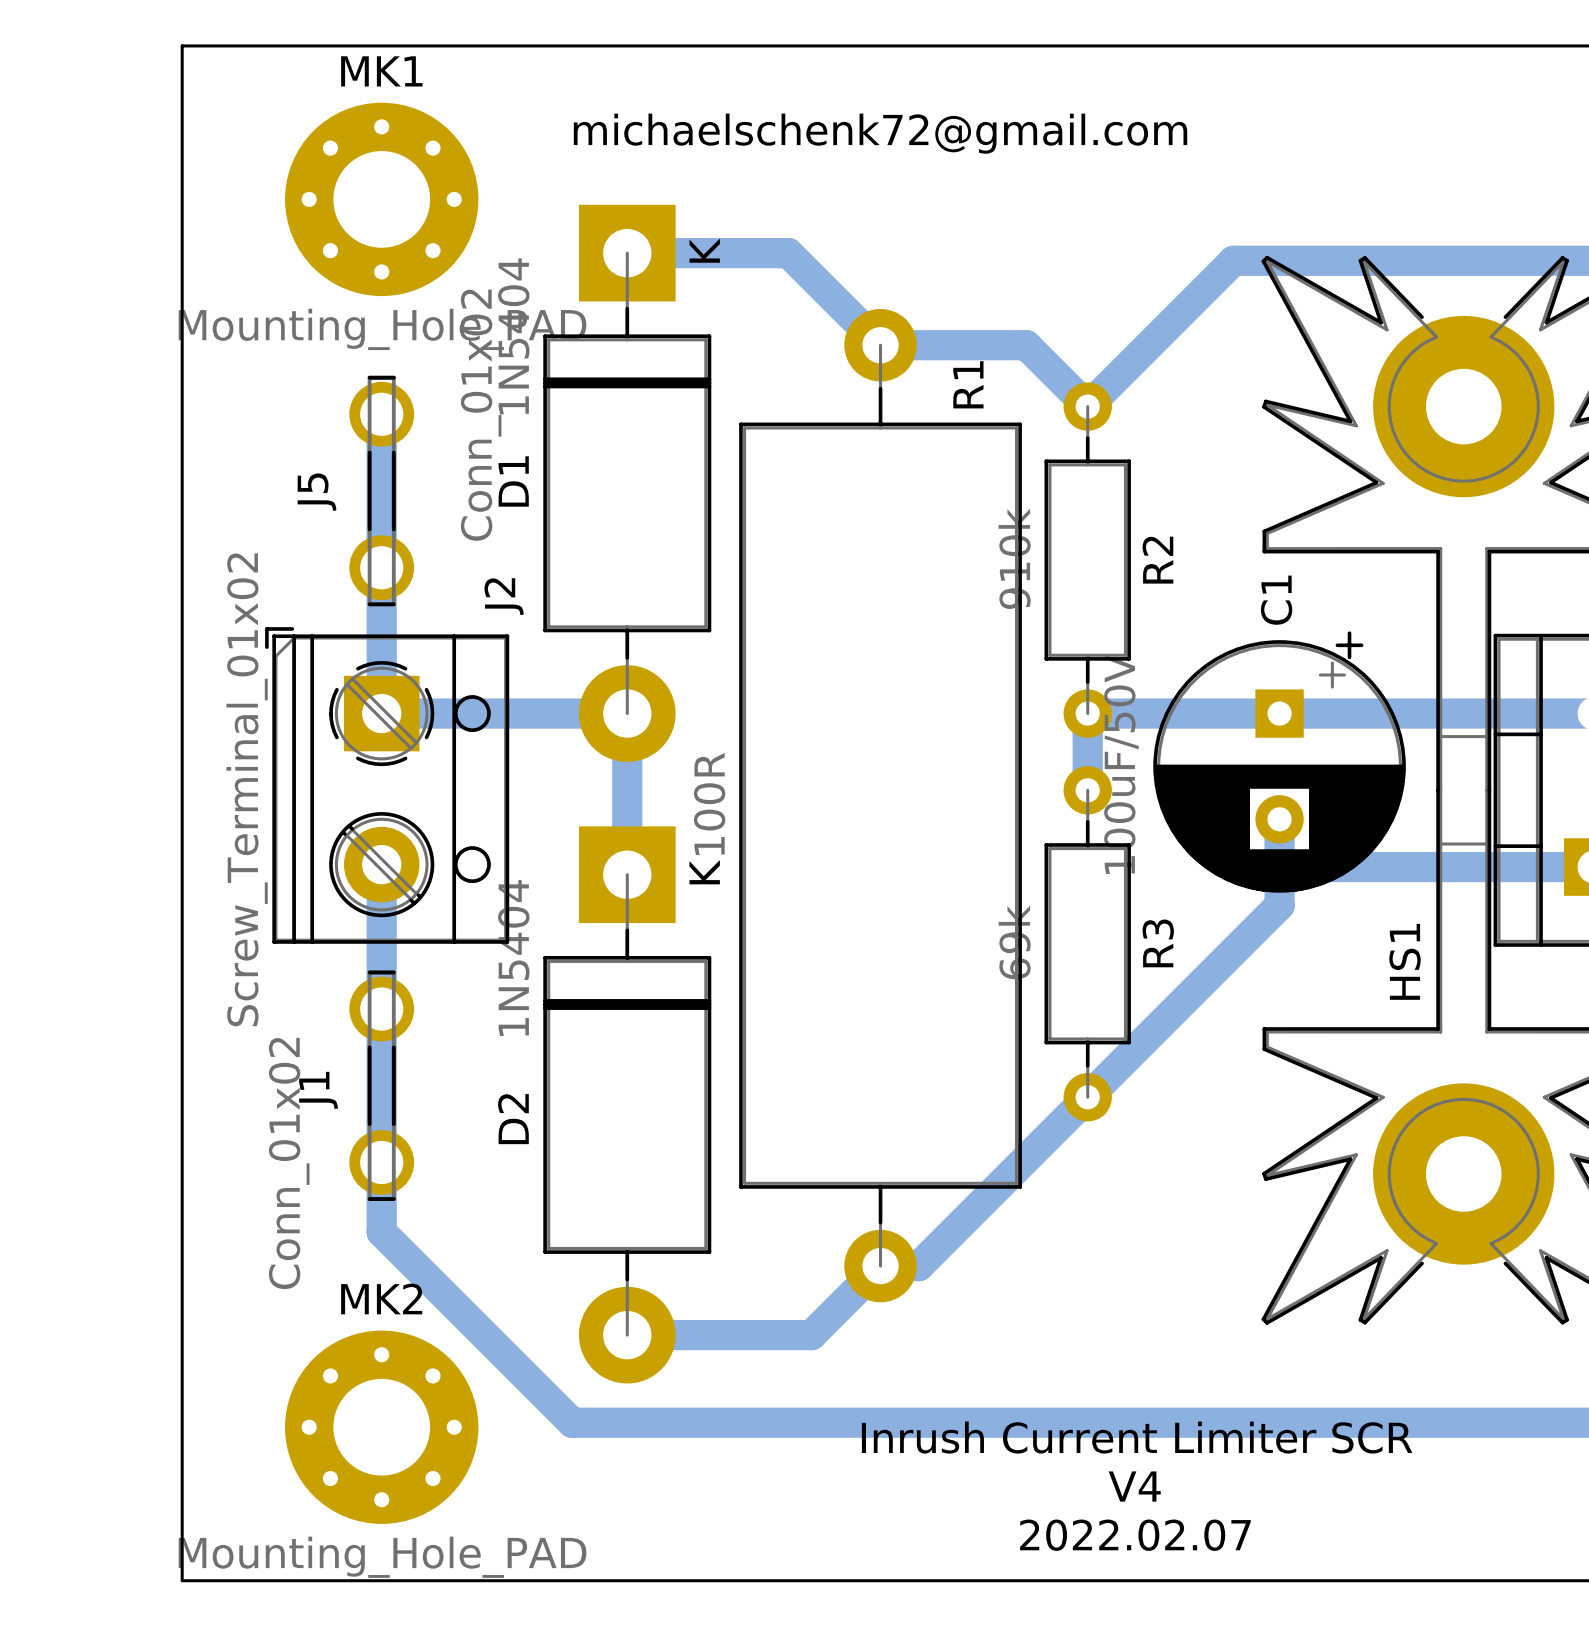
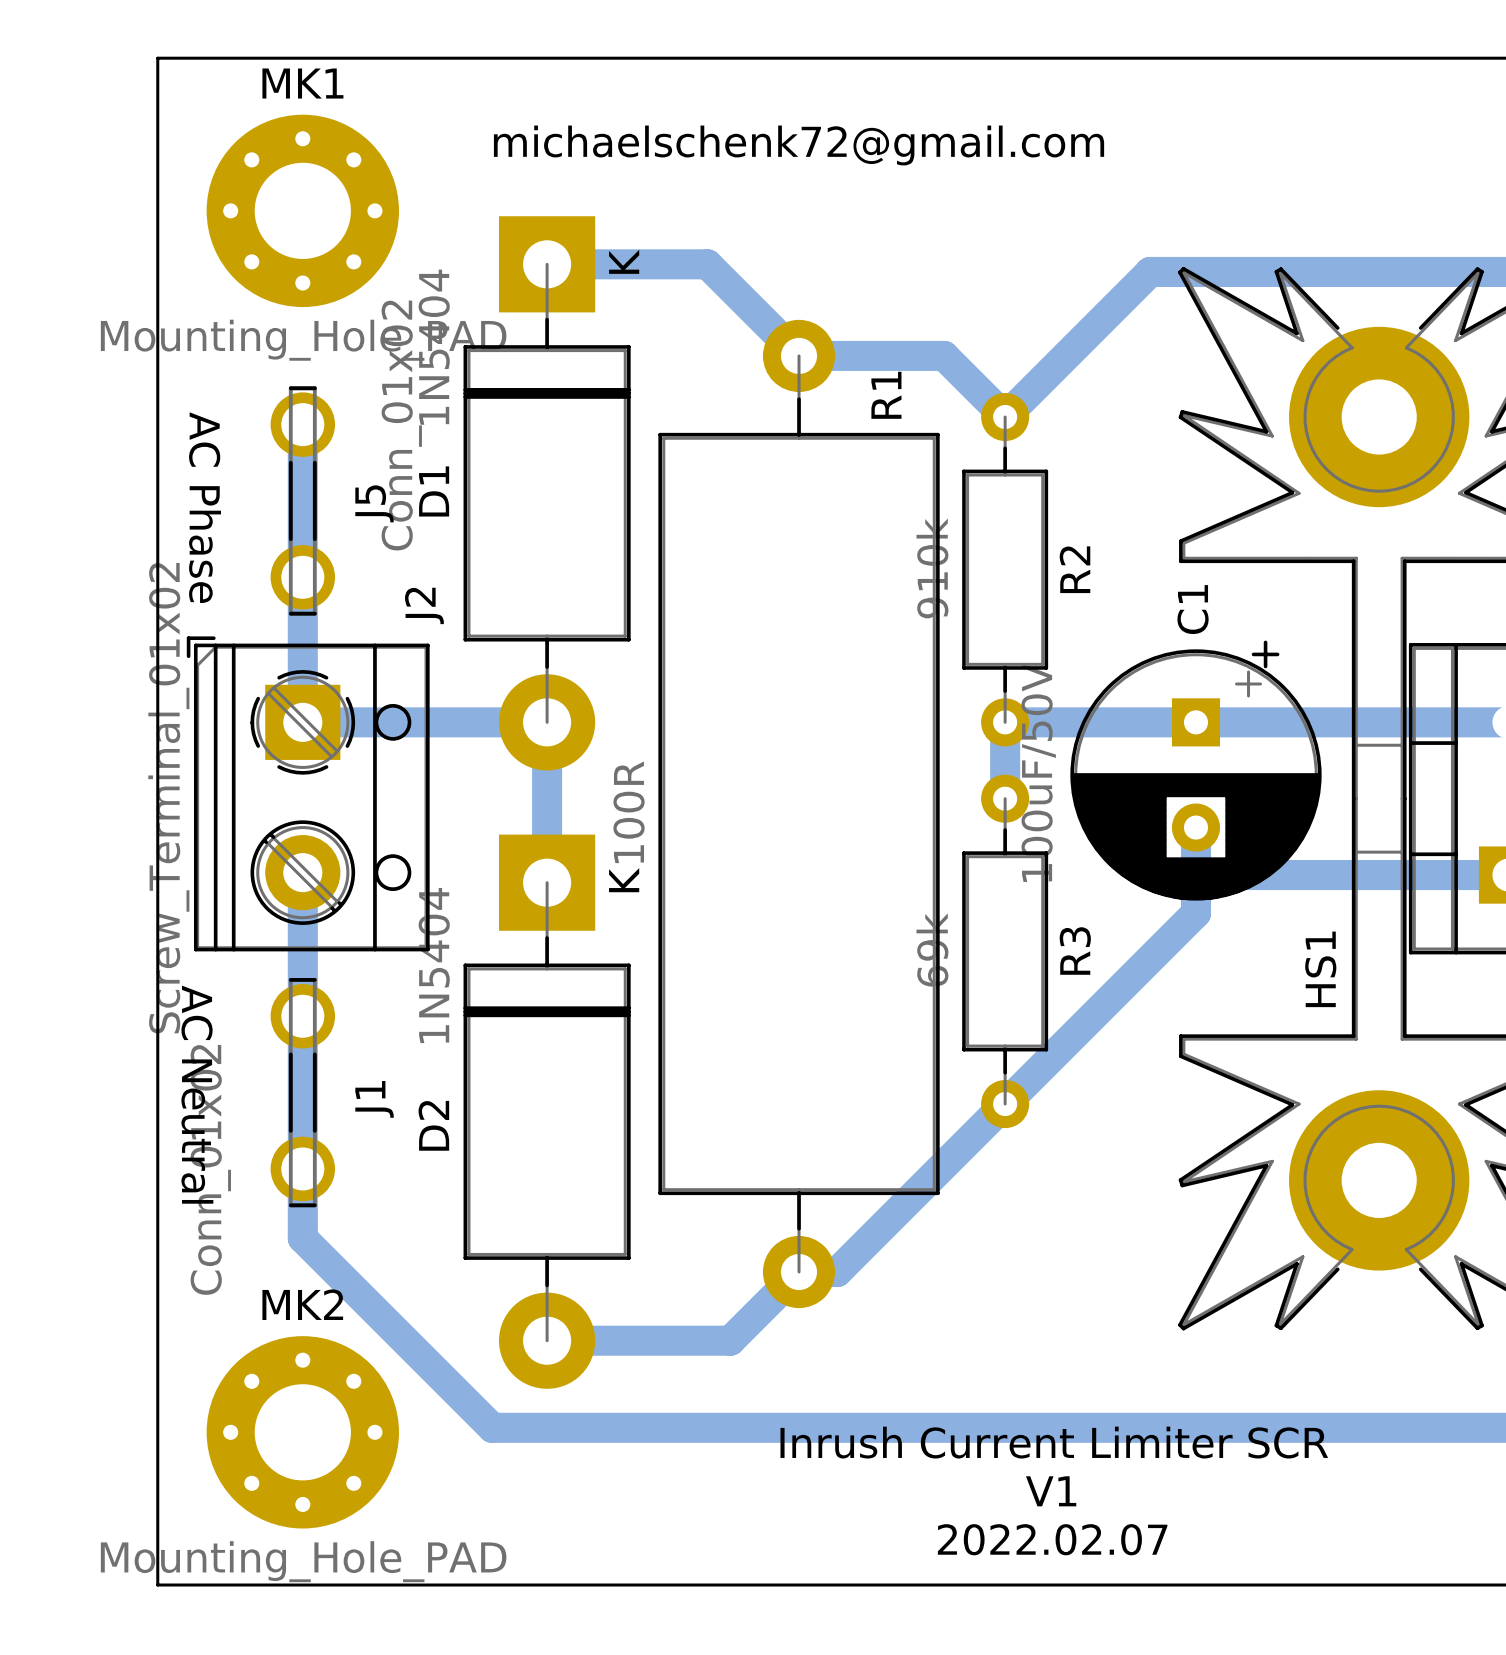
board edge: (235, 45) (182, 45) (182, 1580) (235, 1580) -> (157, 58) (157, 1585)
J5 name position: J5 (316, 492) -> J5 (374, 503)
text: none -> AC Phase (205, 507)
text: none -> AC Neutral (197, 1094)
J1 name position: J1 (318, 1090) -> J1 (374, 1099)
text: V4 (1134, 1486) -> V1 (1051, 1491)

